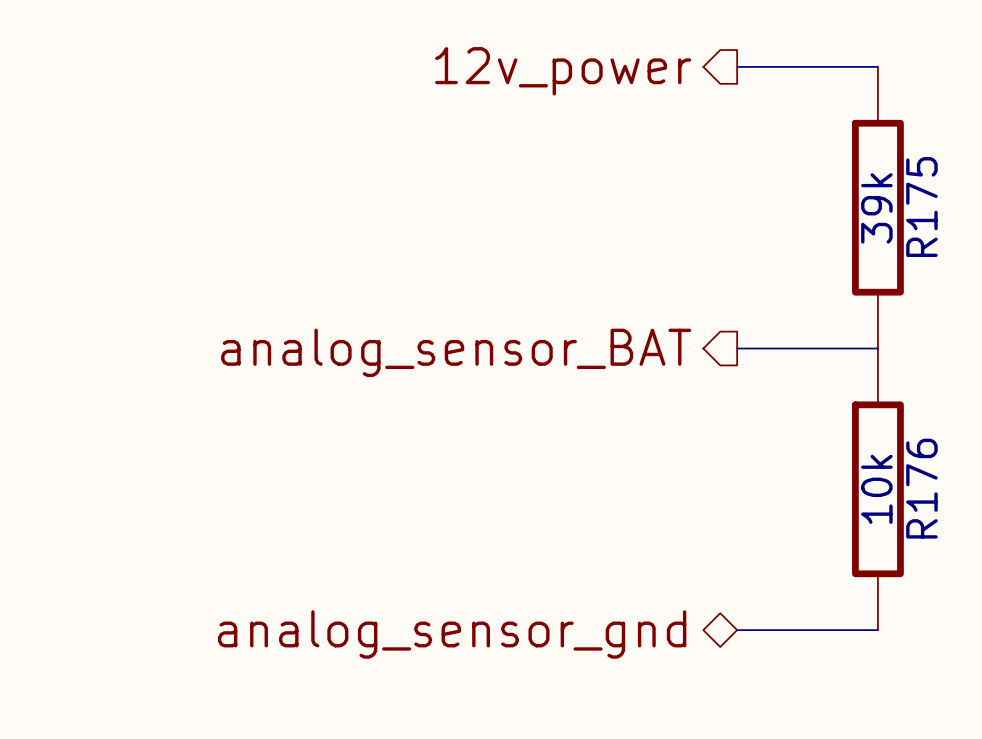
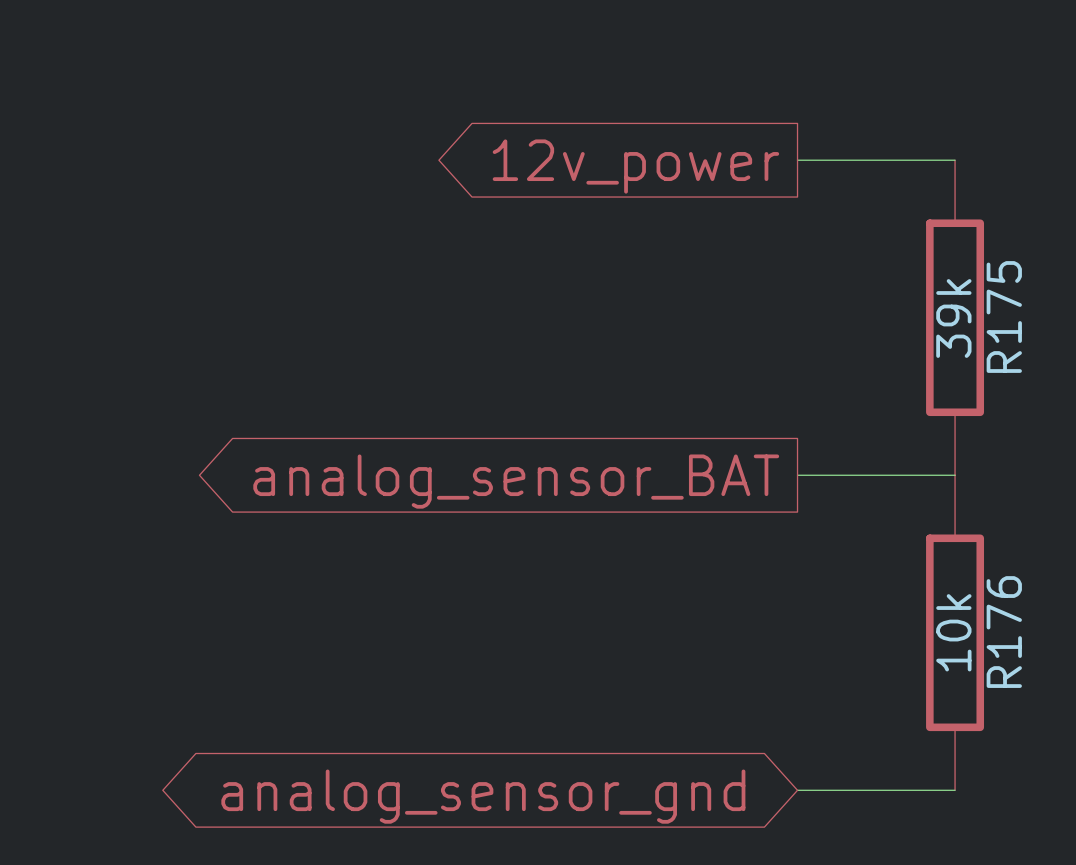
hierarchical label: 12v_power (563, 71) -> none
global label: none -> 12v_power (635, 166)
hierarchical label: analog_sensor_BAT (456, 352) -> none
global label: none -> analog_sensor_BAT (516, 481)
hierarchical label: analog_sensor_gnd (452, 634) -> none
global label: none -> analog_sensor_gnd (483, 796)

